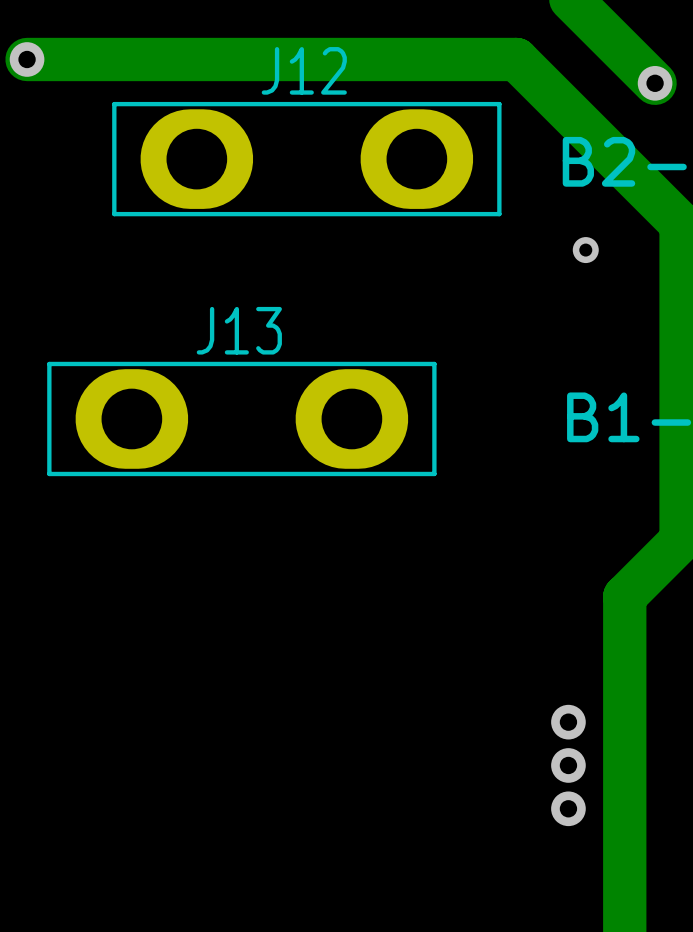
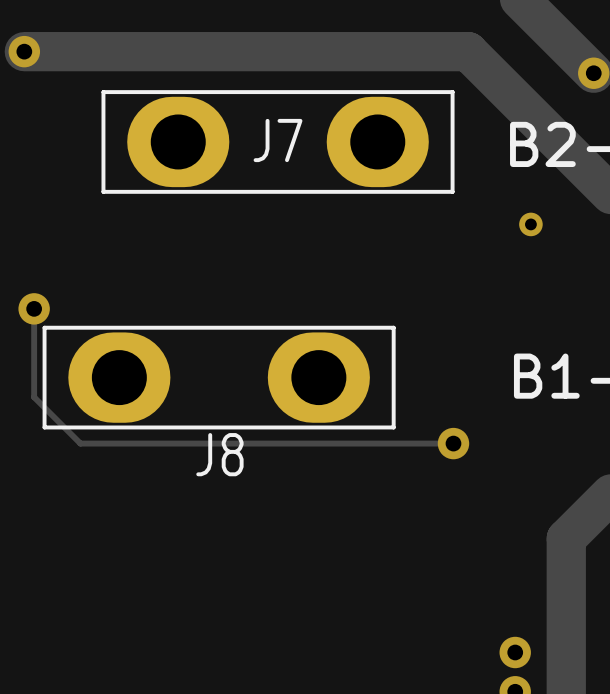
J12 name: J12 (304, 70) -> J7 (278, 140)
J13 name: J13 (239, 330) -> J8 (219, 454)
track: none -> (34, 308) (34, 397) (80, 443) (453, 443)
via: none -> (34, 308)
via: none -> (453, 443)

